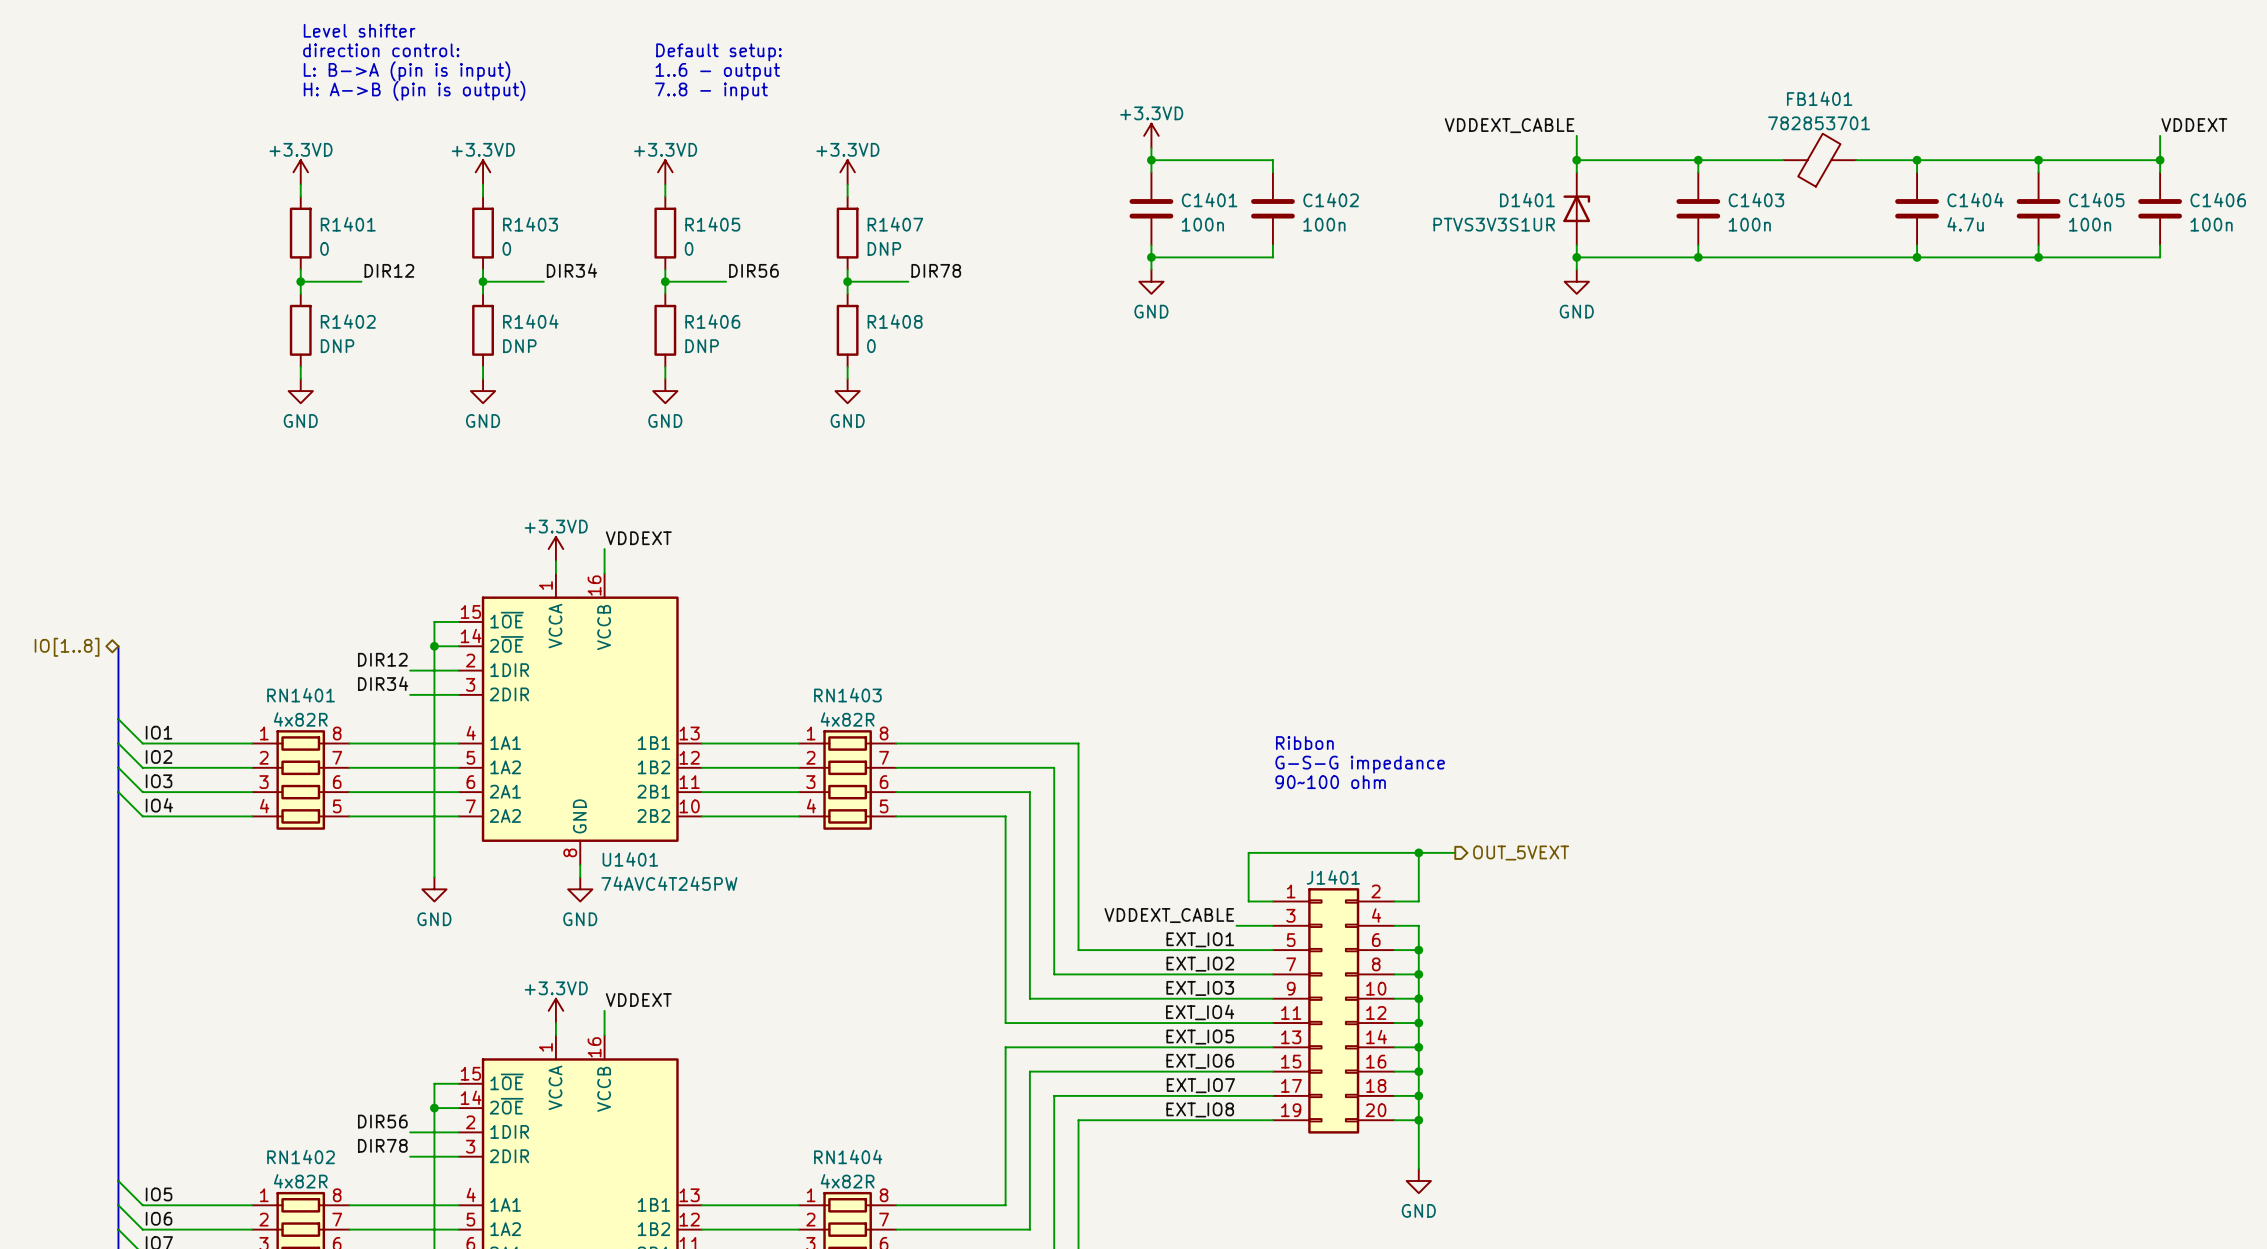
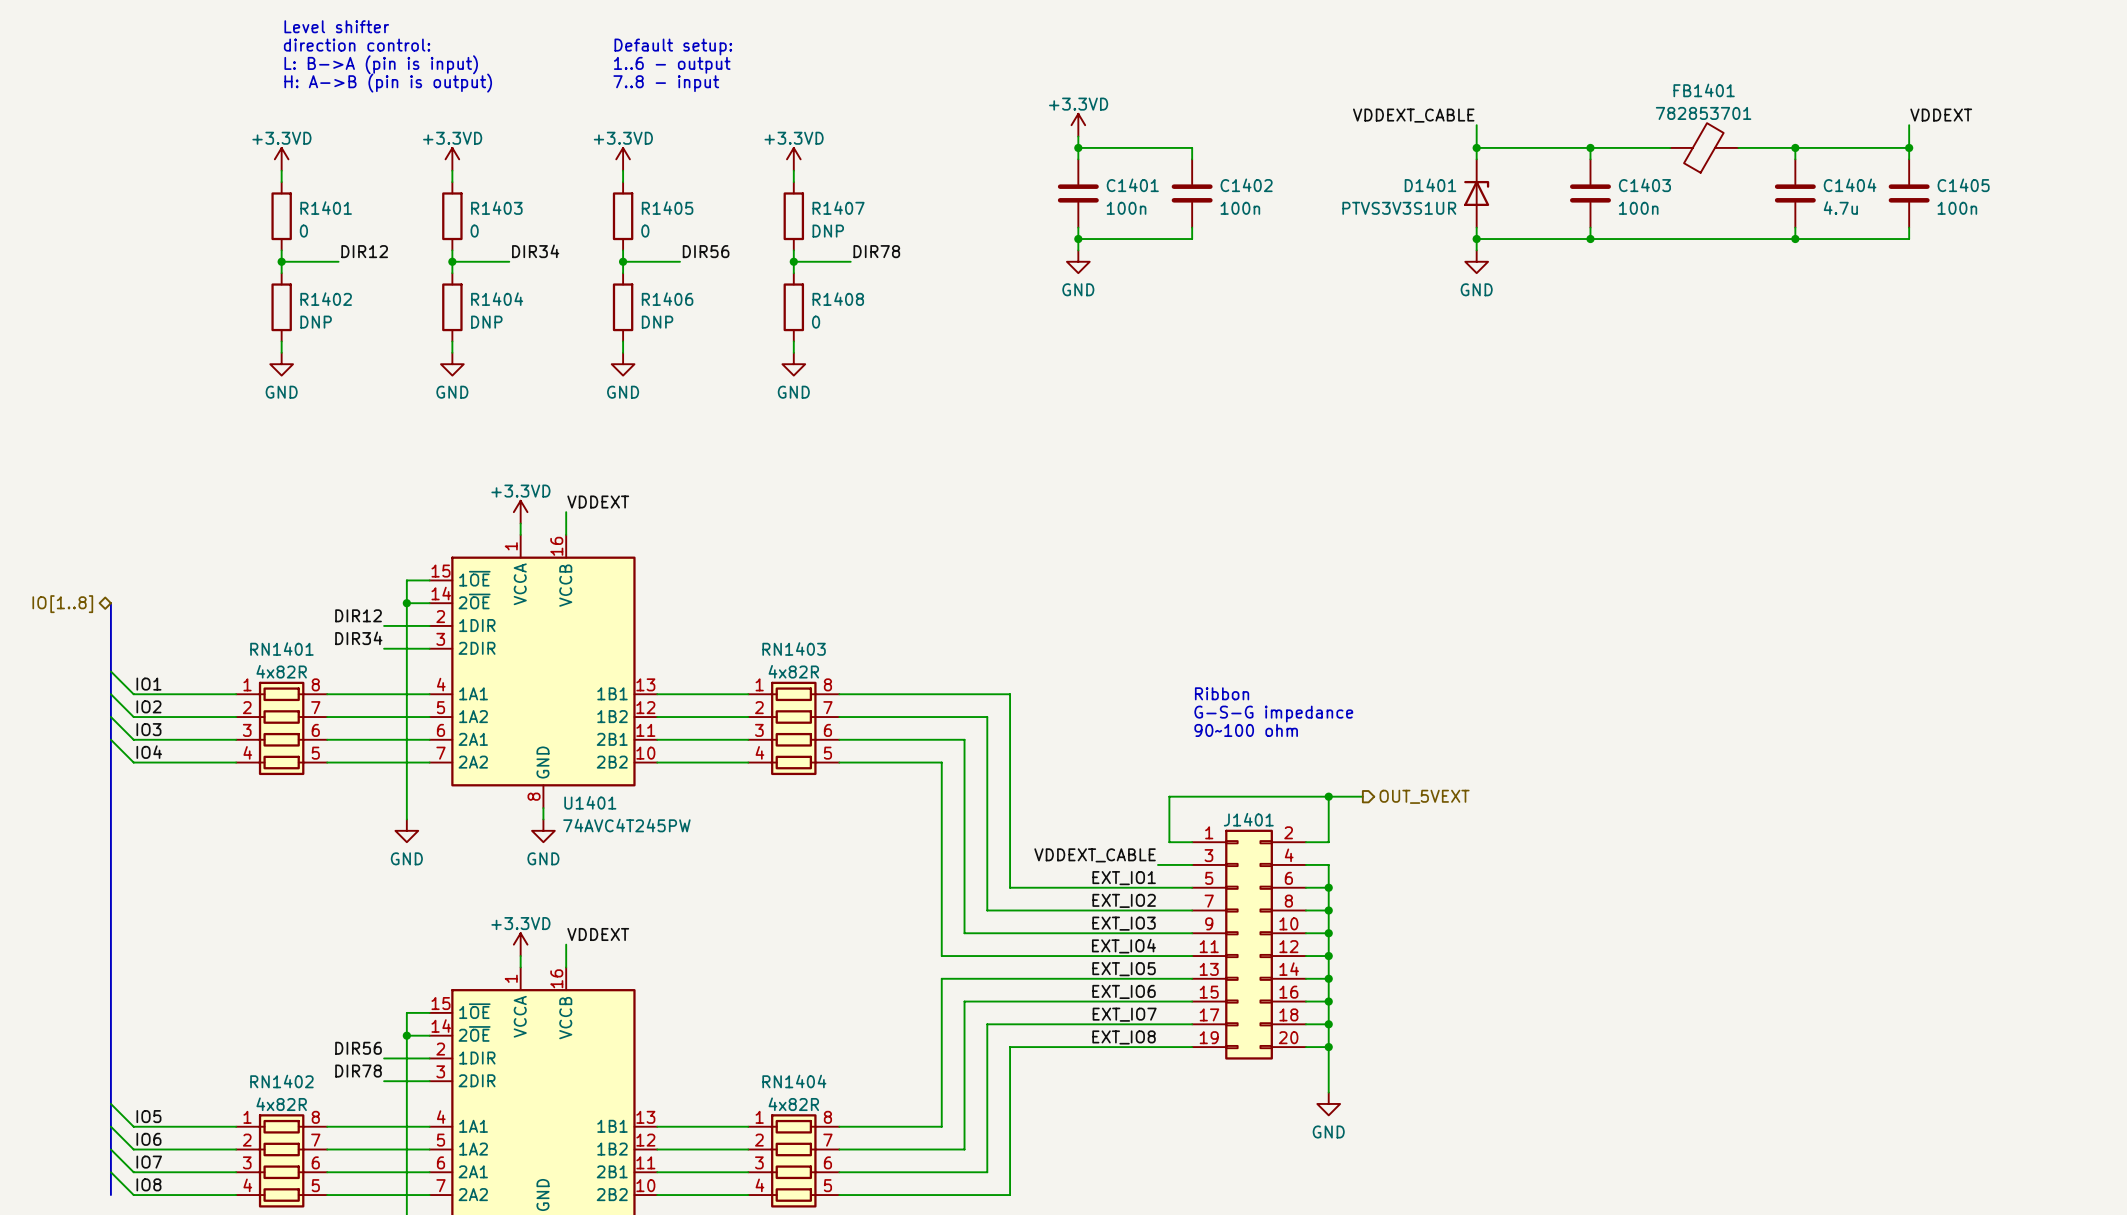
label position: VDDEXT (2194, 125) -> VDDEXT (1941, 115)
wire: (2160, 135) (2160, 172) -> none
wire: (2038, 160) (2160, 160) -> (1909, 147) (1909, 125)
junction: (2160, 160) -> none
C1406: 100n (2160, 208) -> none
wire: (2160, 245) (2160, 257) (2038, 257) -> none
junction: (2038, 257) -> none

